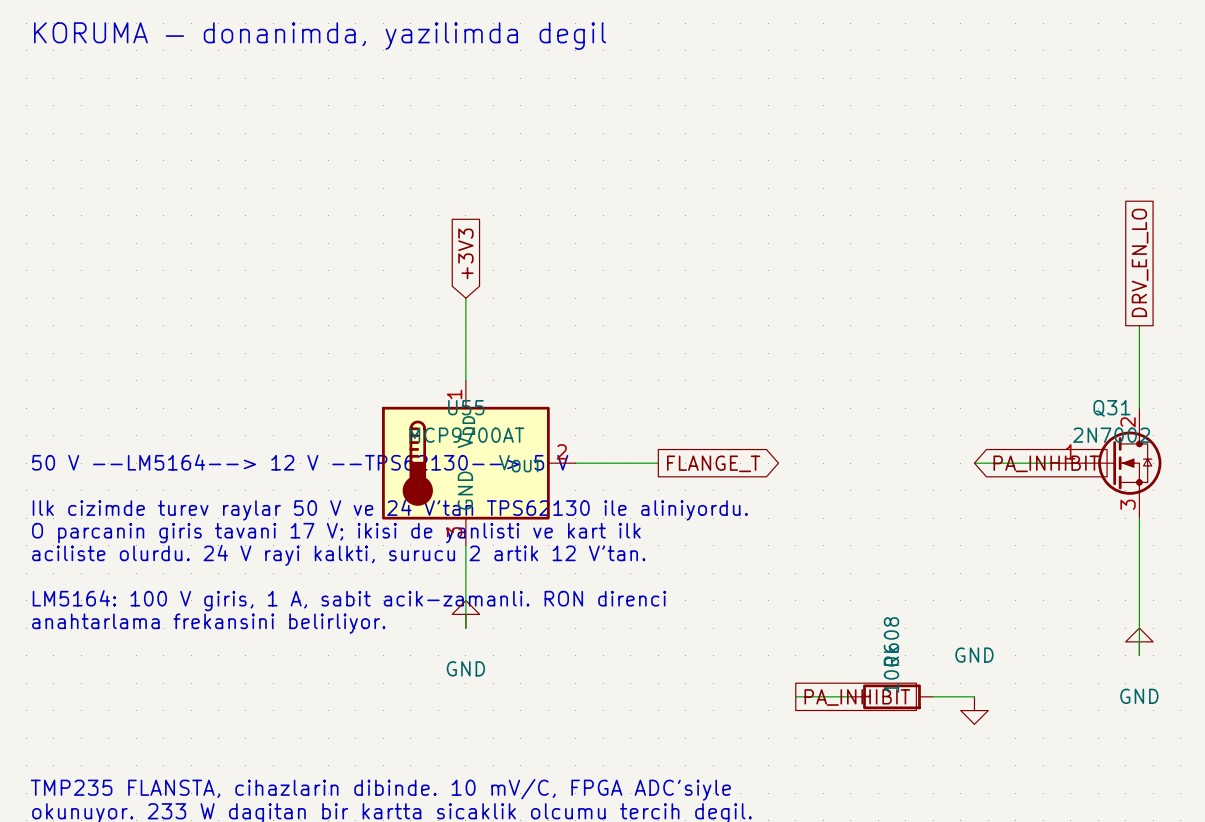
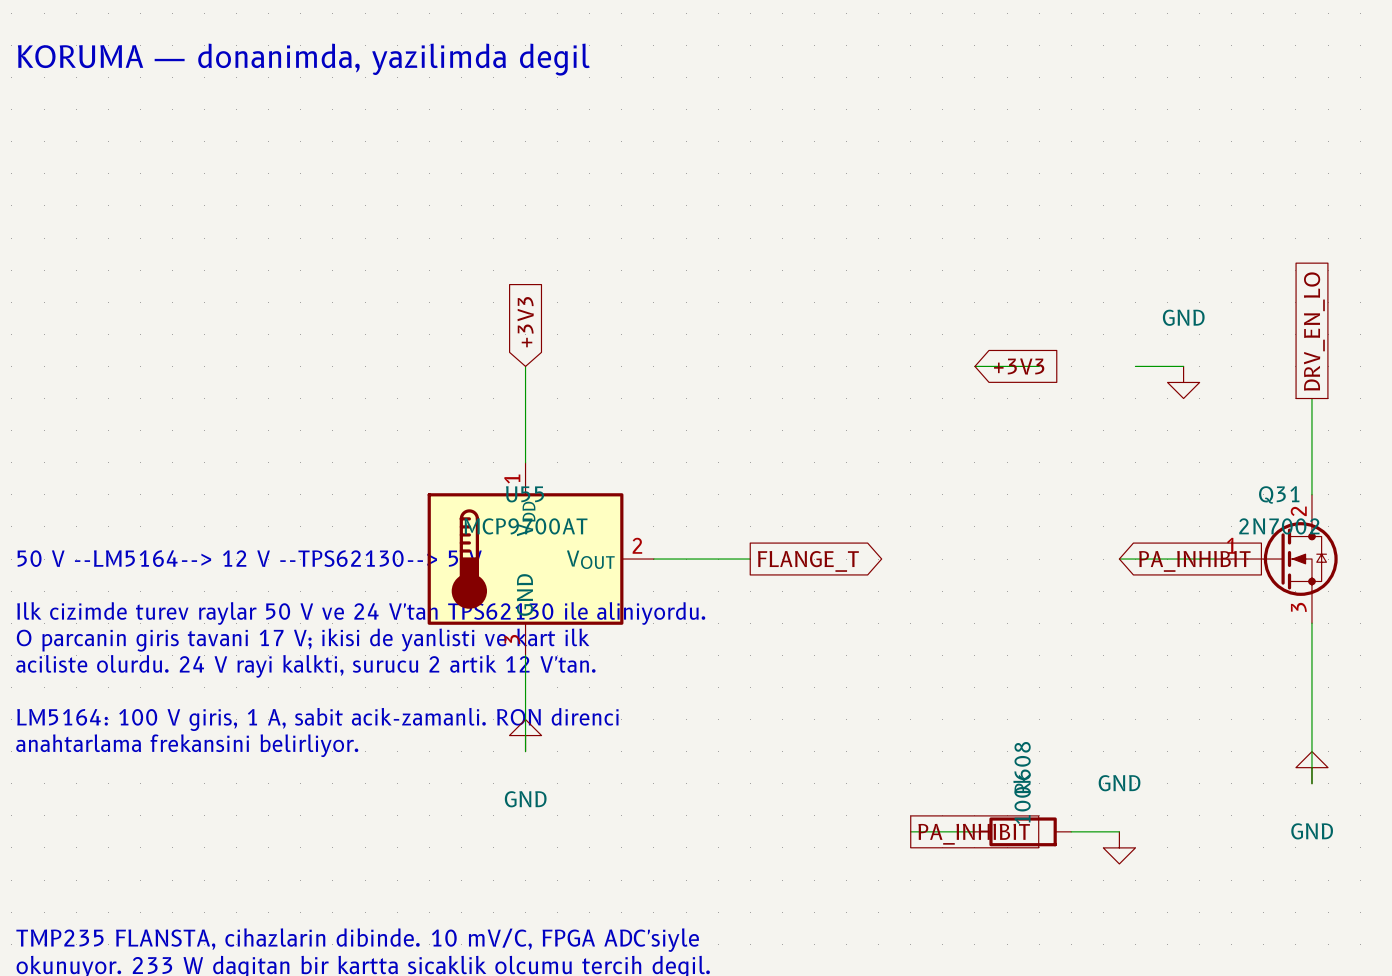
wire: none -> (974, 366) (1039, 366)
global label: none -> +3V3 (1019, 366)
wire: none -> (1135, 366) (1183, 366)
power symbol: none -> GND (1183, 382)

